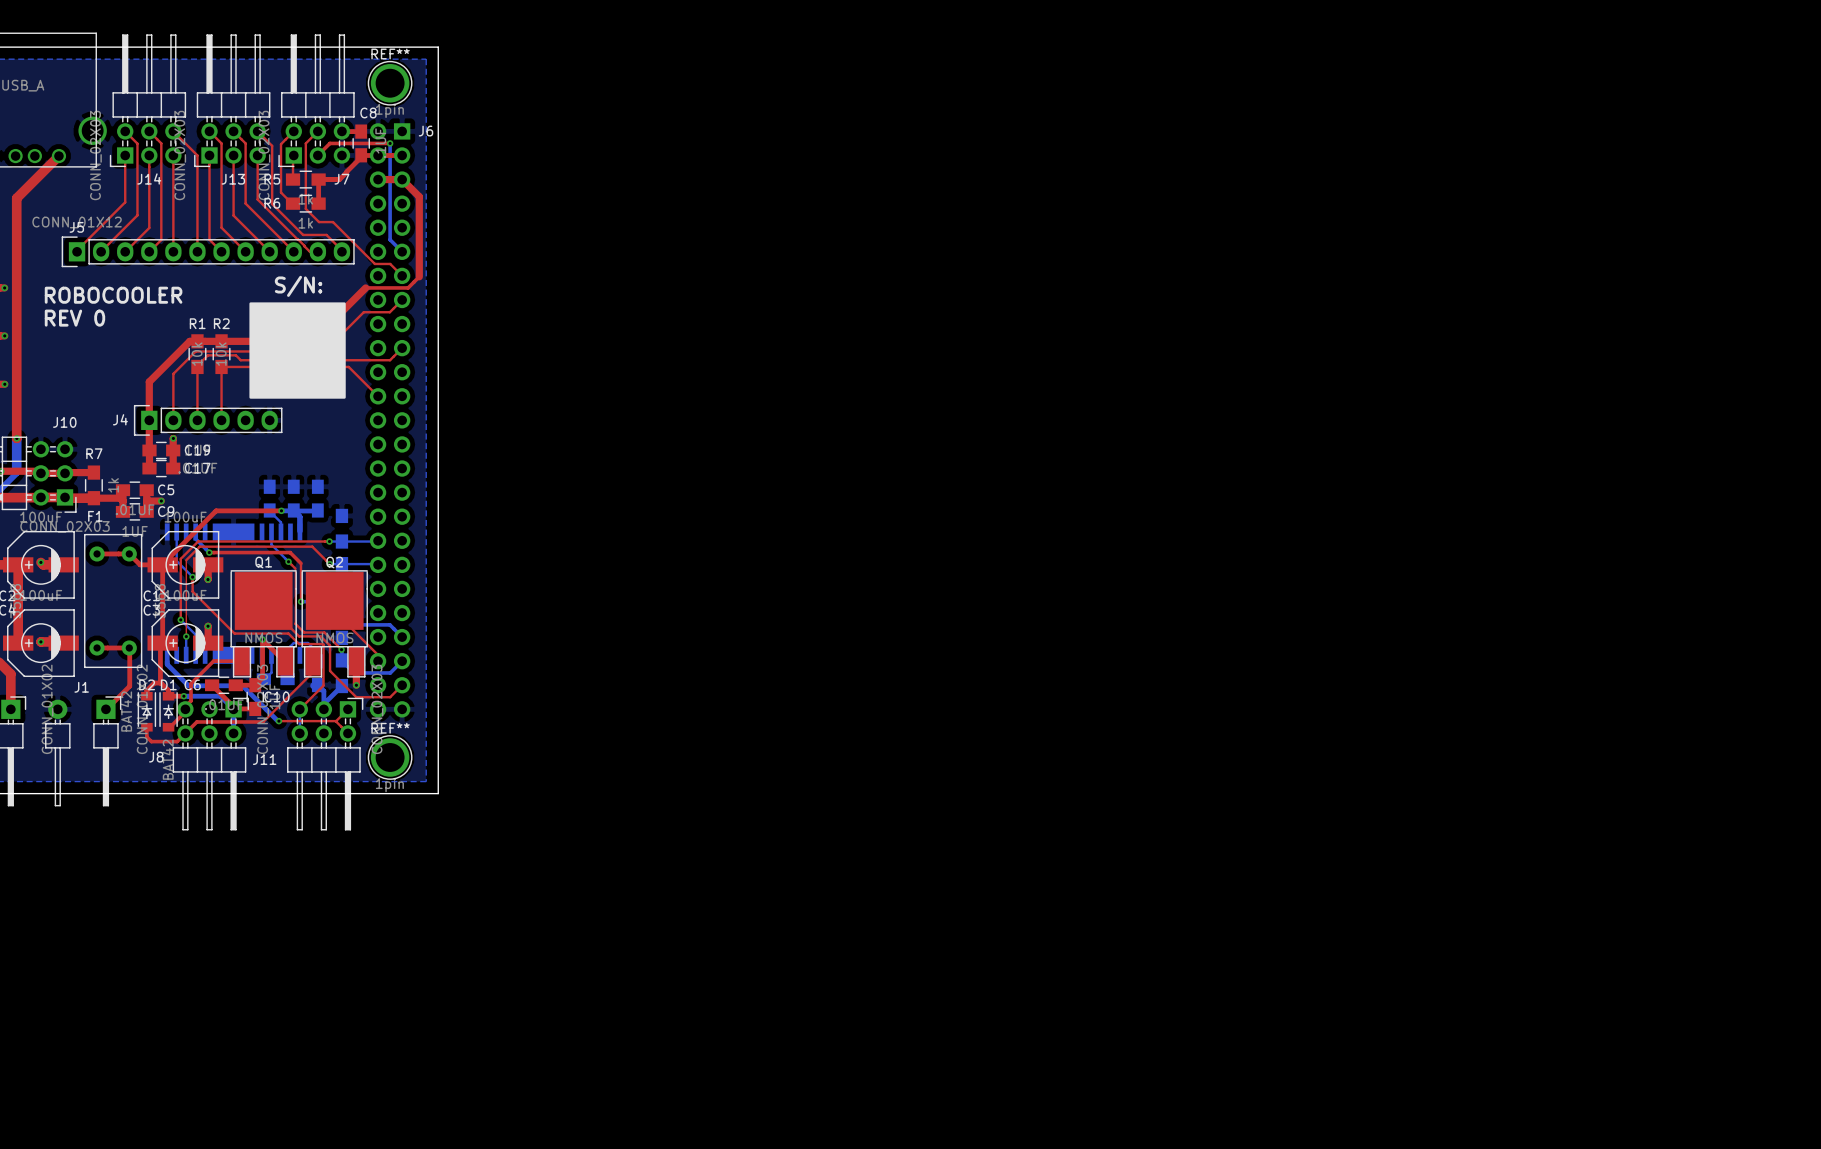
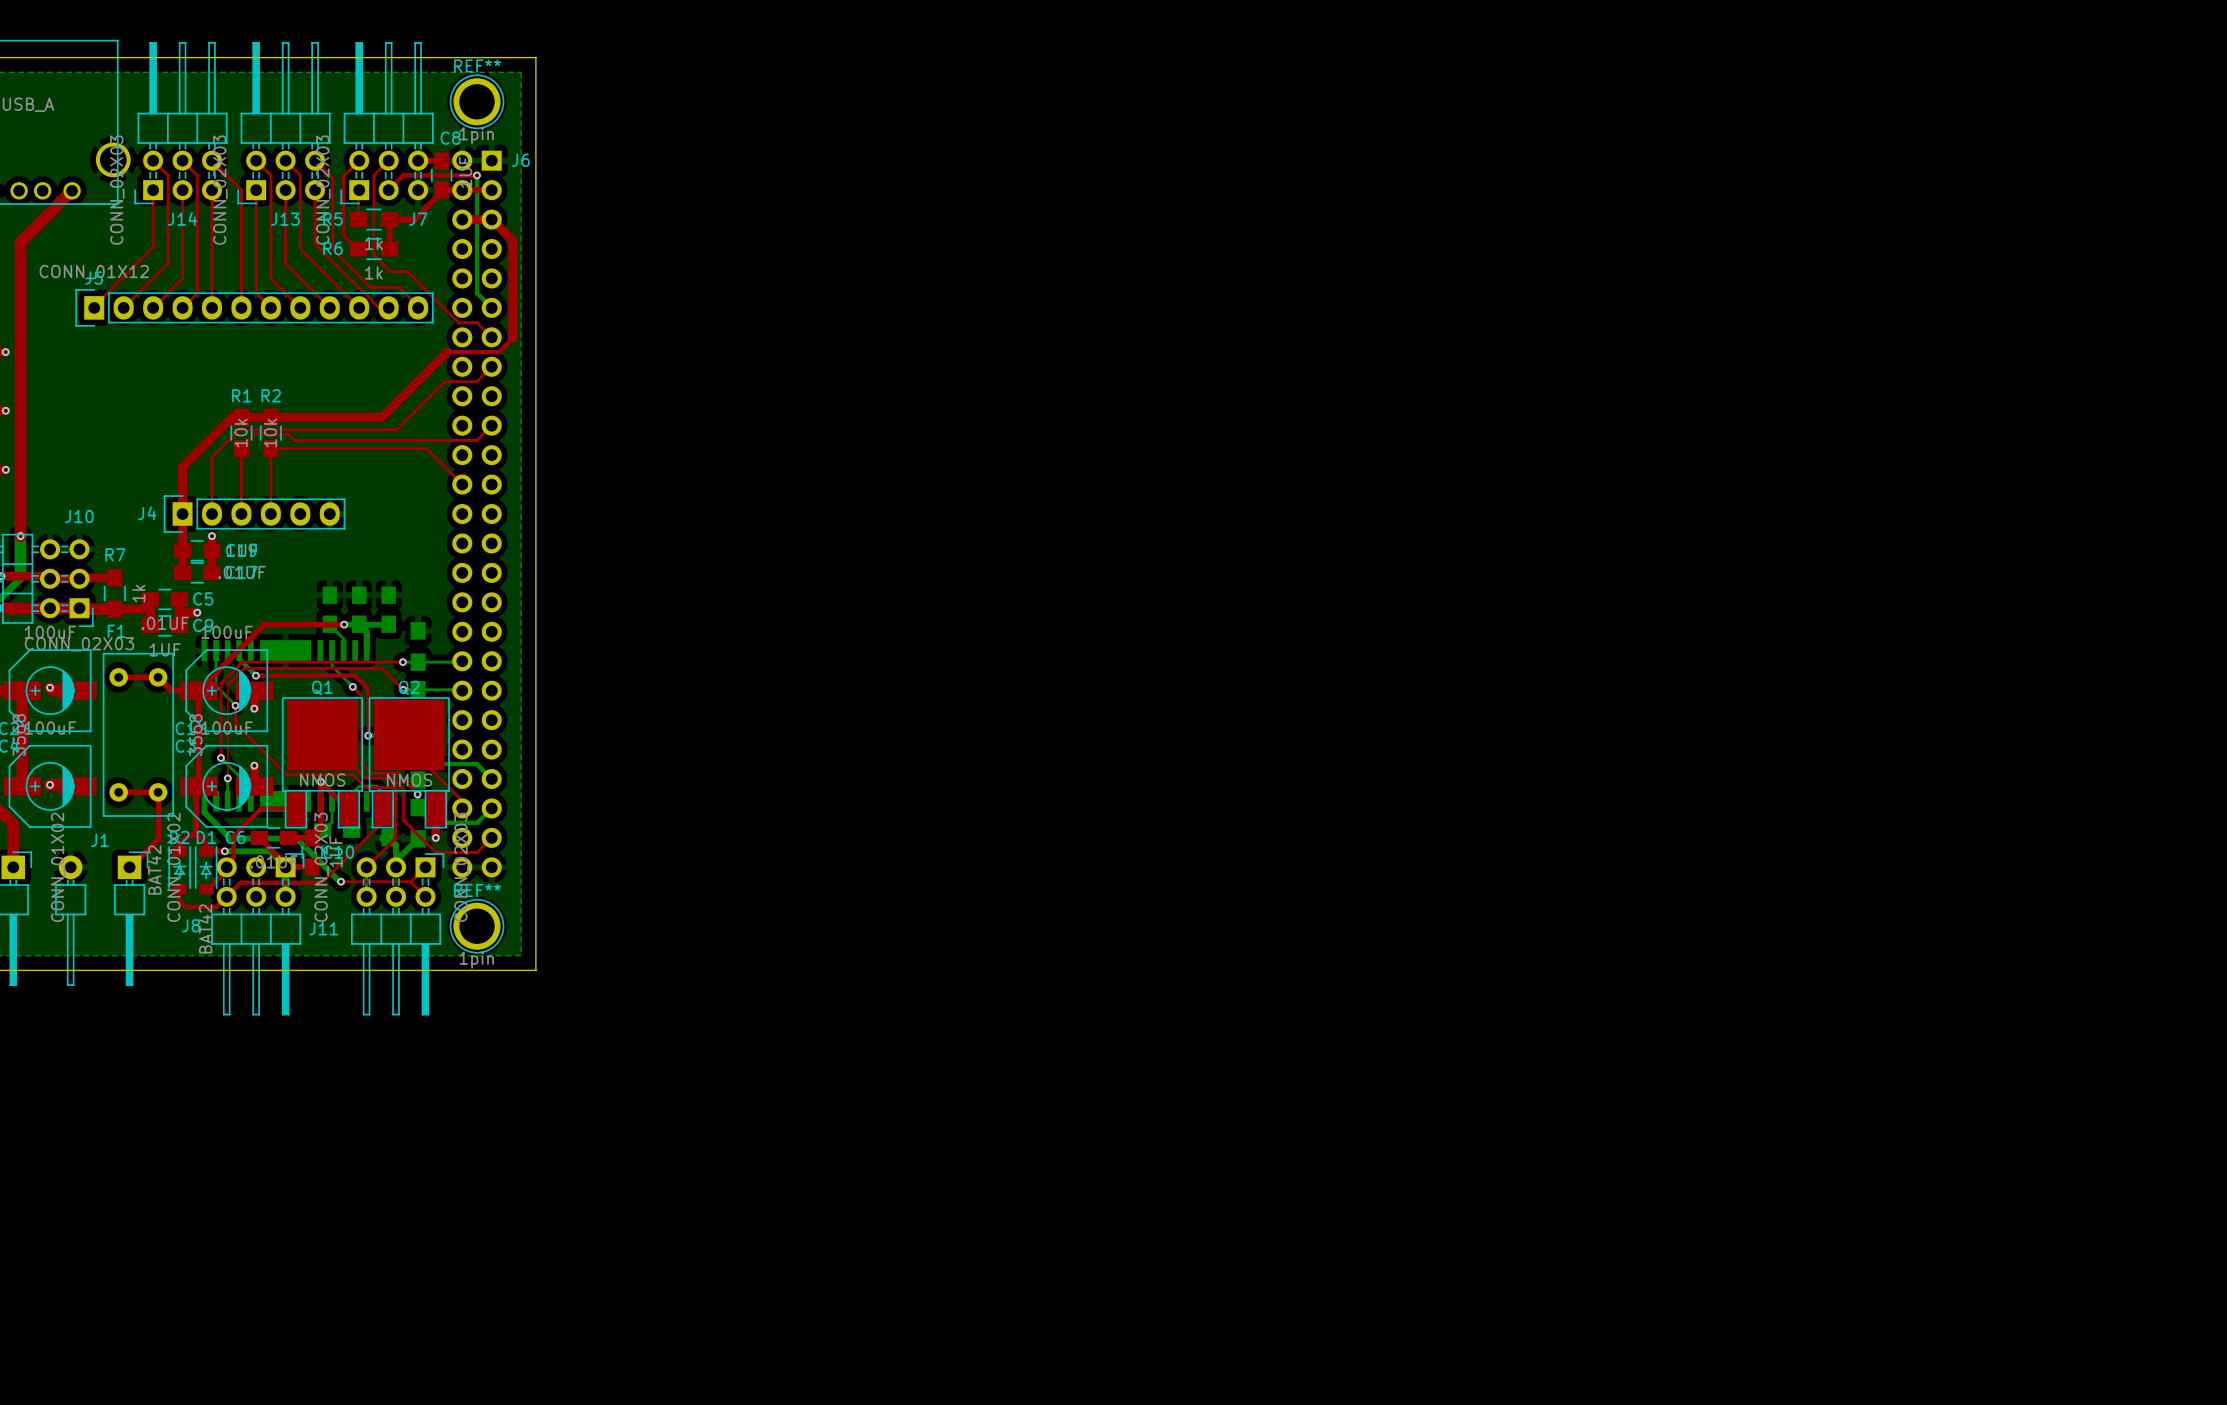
text: S/N: (298, 286) -> none
text: ROBOCOOLER (113, 295) -> none
drawing: [249, 302, 346, 399] -> none
text: REV 0 (74, 318) -> none

